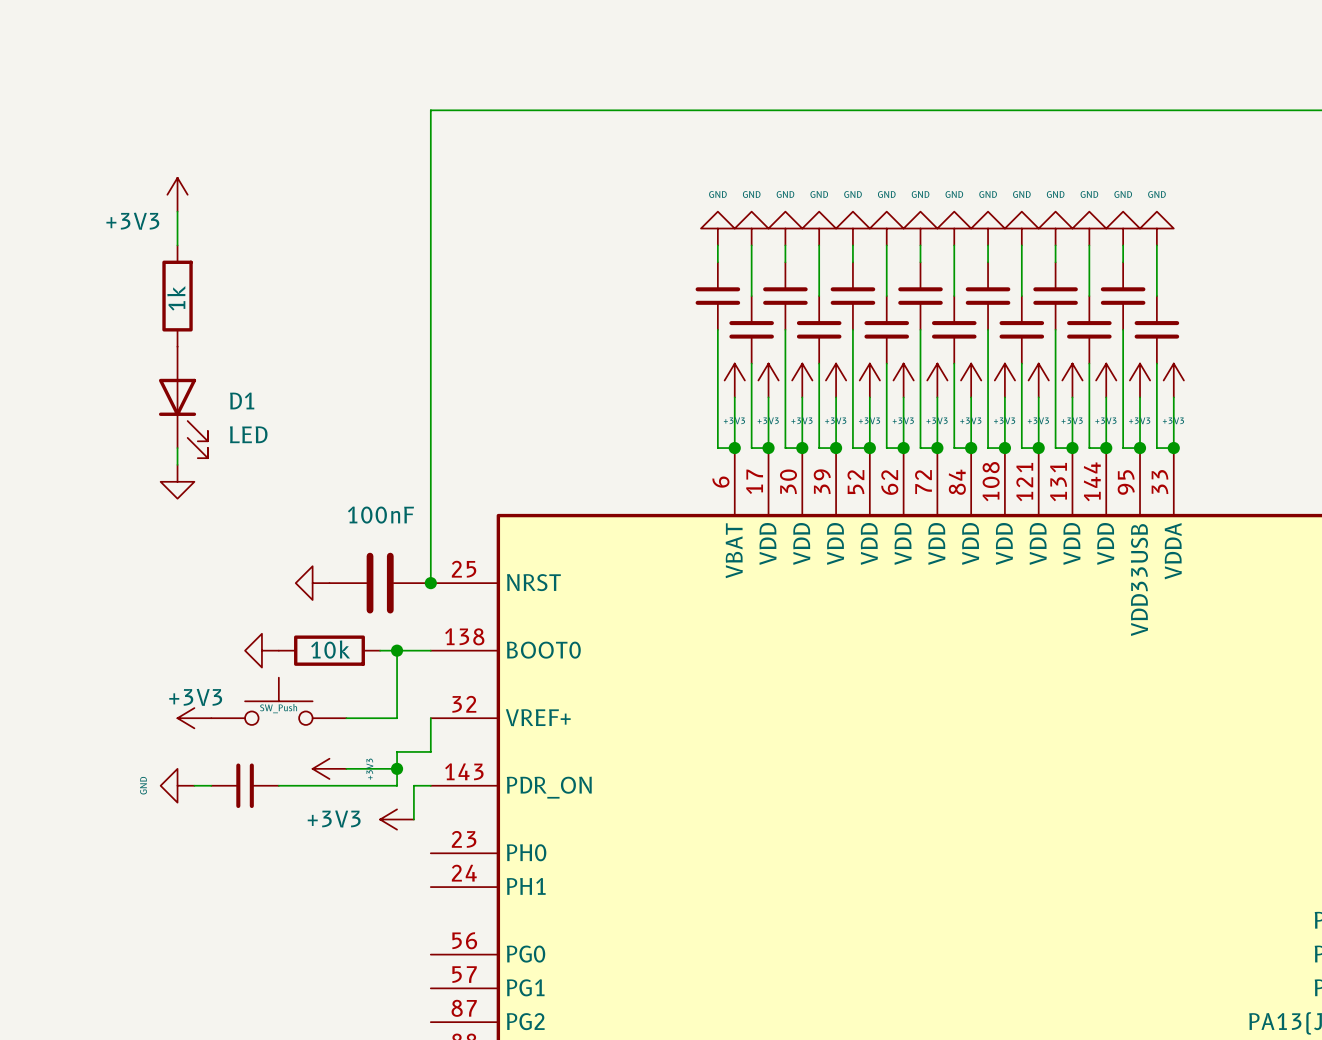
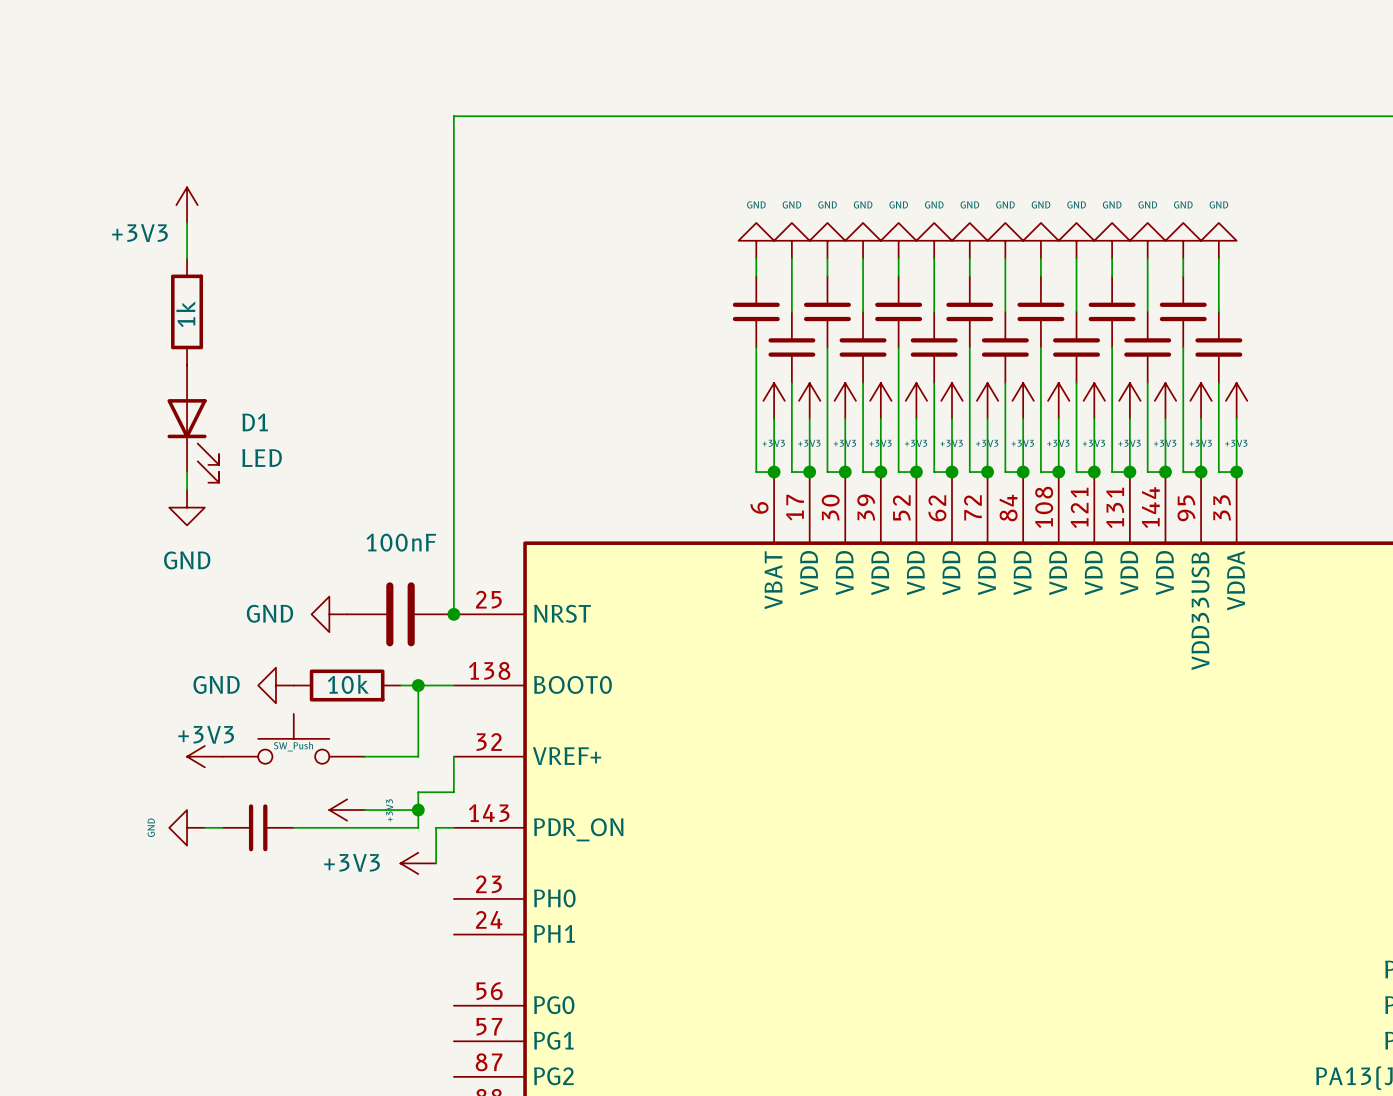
power symbol text: none -> GND (187, 560)
power symbol text: none -> GND (269, 613)
power symbol text: none -> GND (216, 684)

